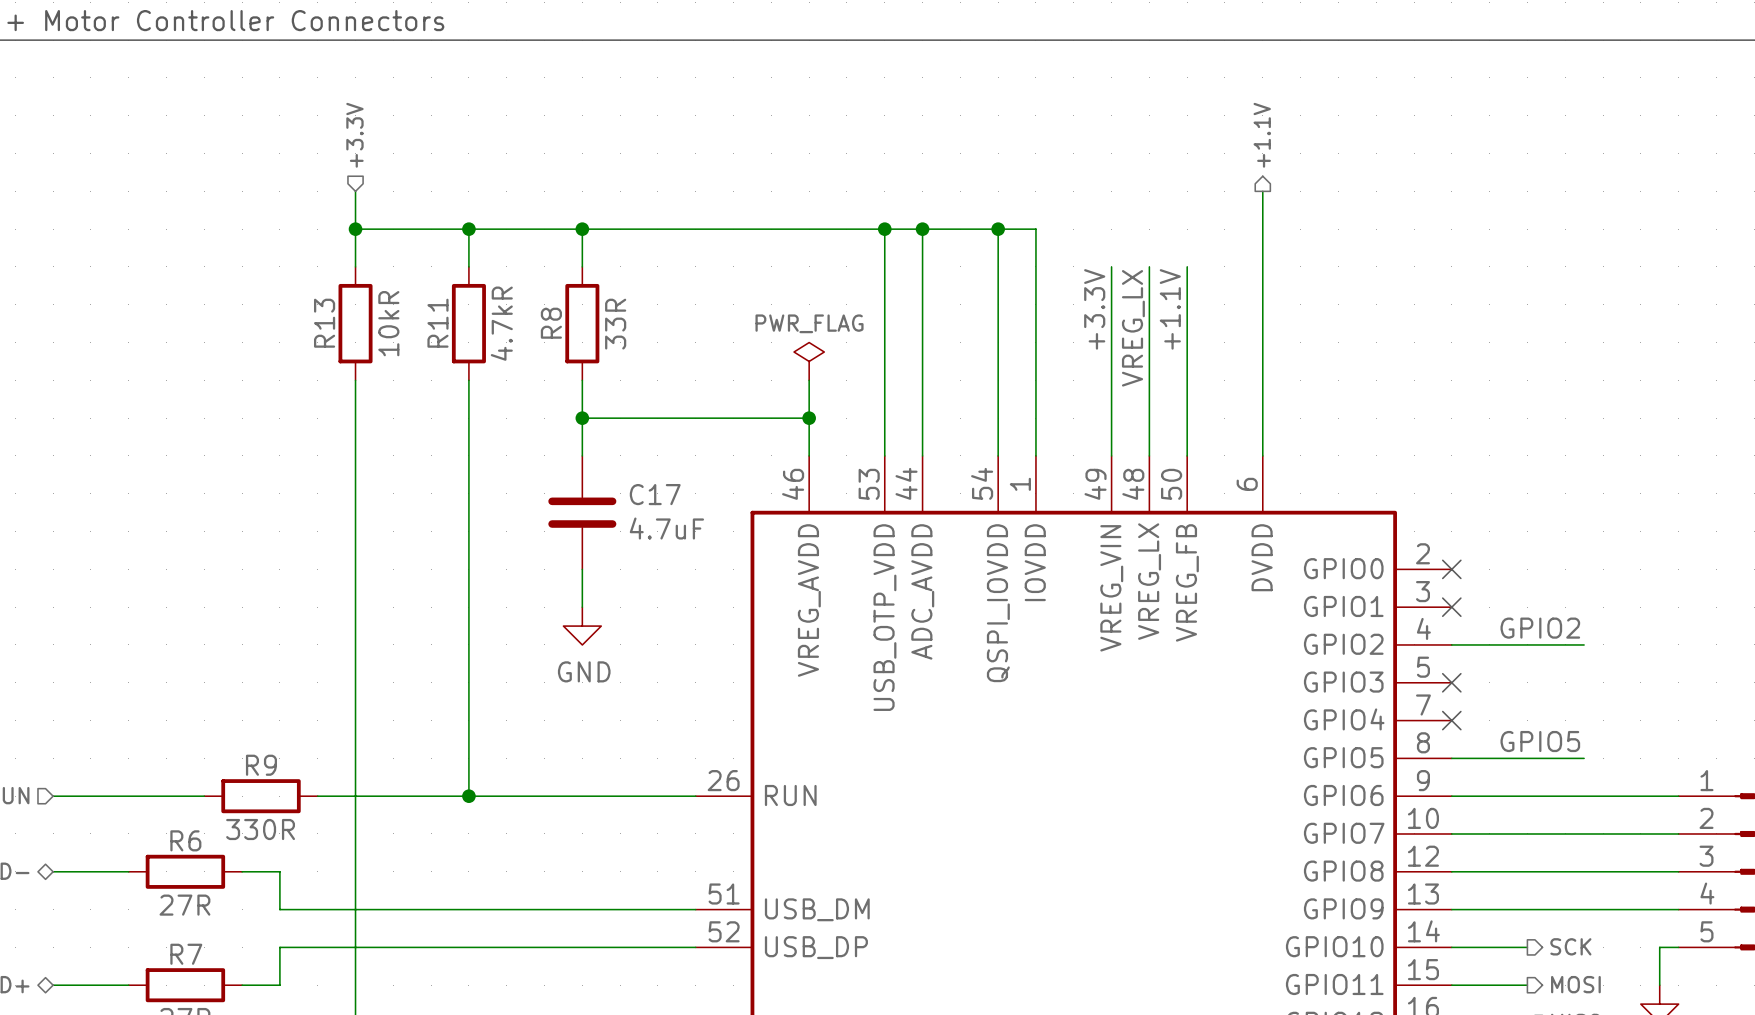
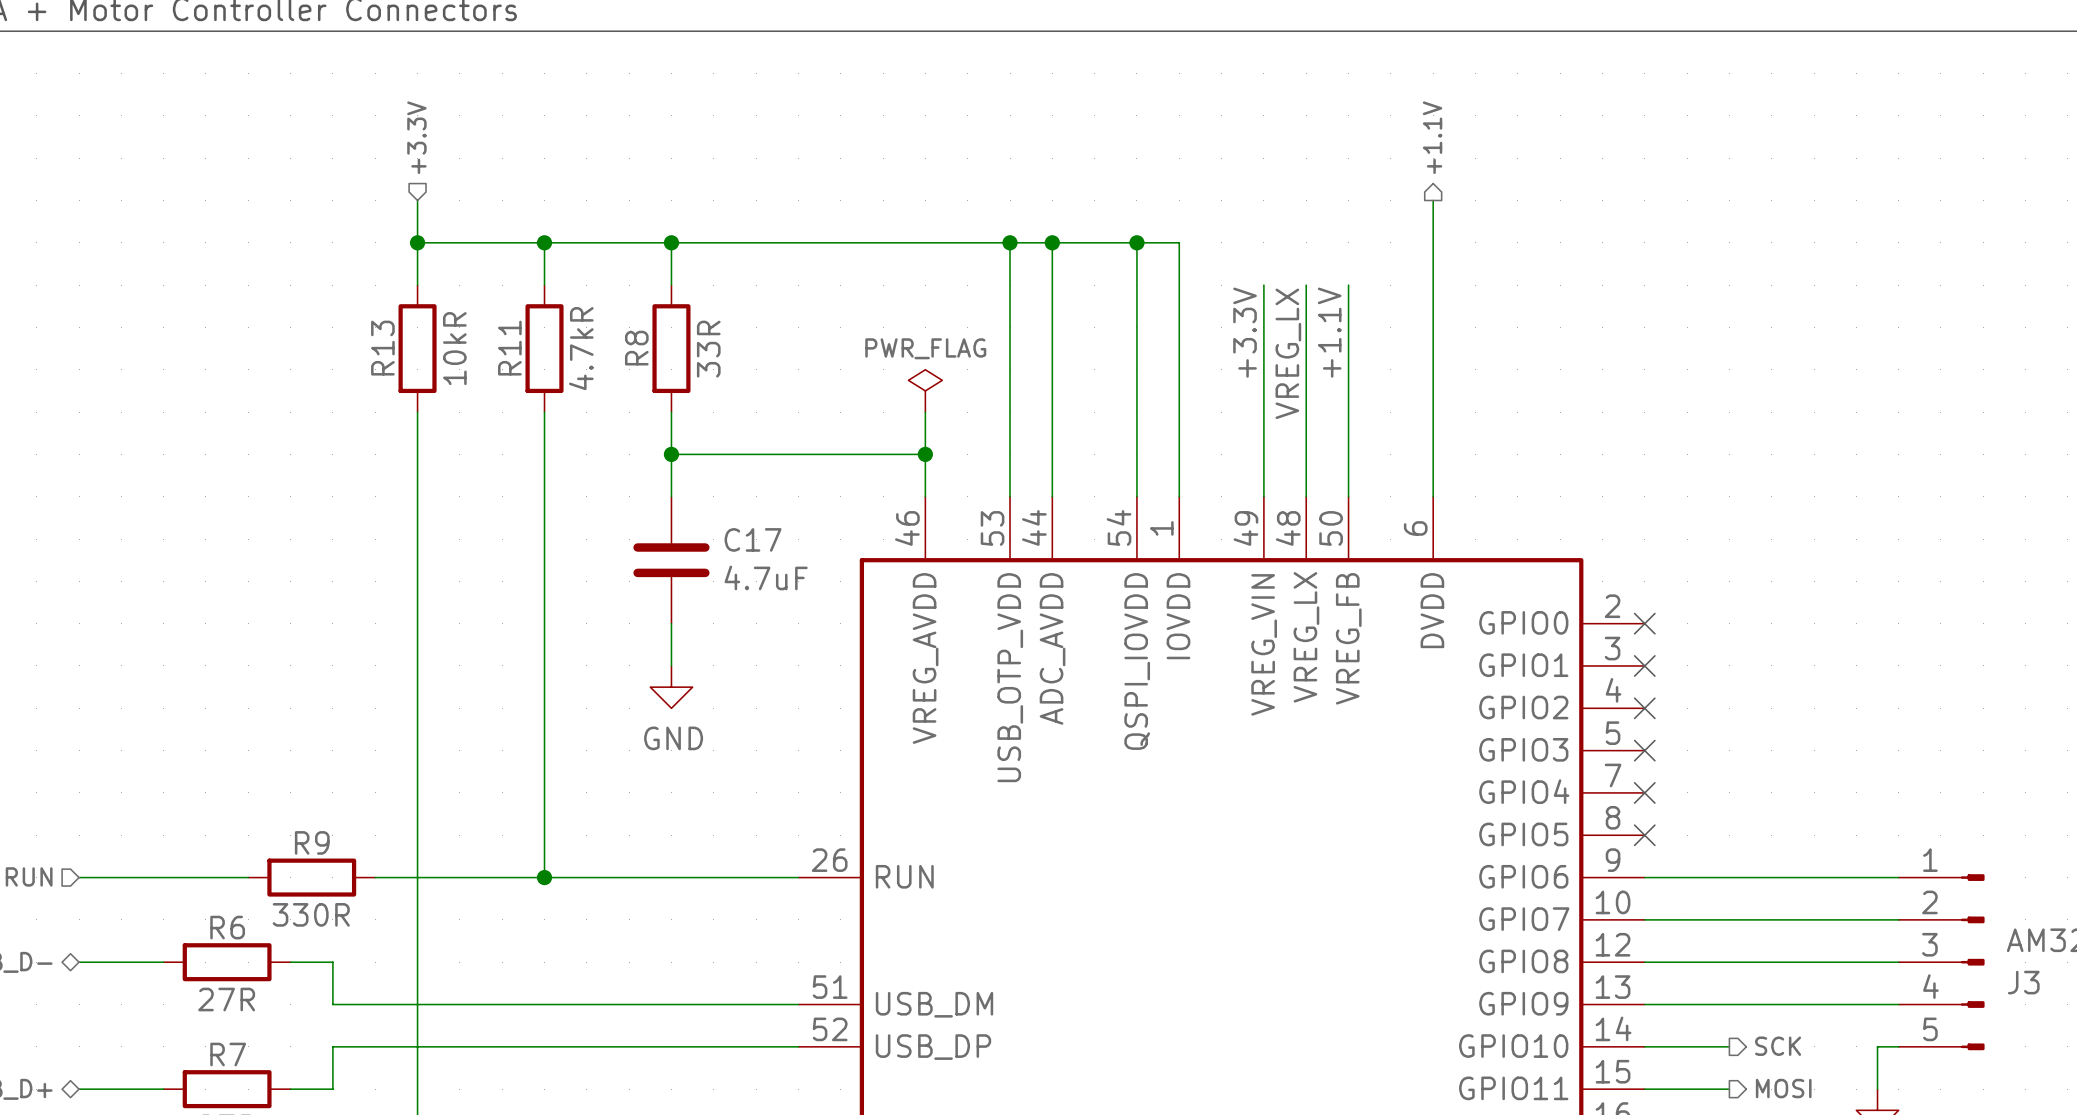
label: GPIO2 (1540, 628) -> none
wire: (1451, 644) (1584, 644) -> none
no-connect mark: none -> (1644, 708)
label: GPIO5 (1540, 741) -> none
wire: (1451, 758) (1584, 758) -> none
no-connect mark: none -> (1644, 835)

